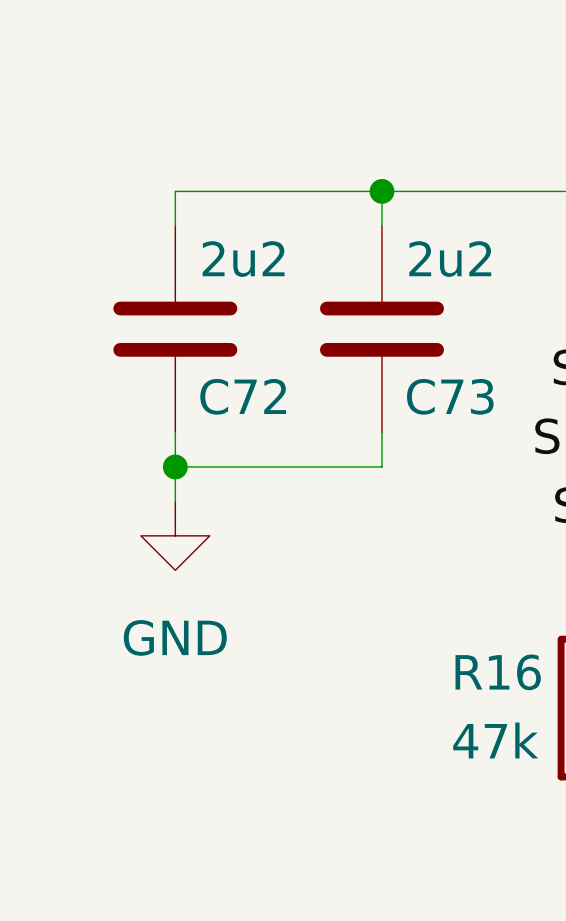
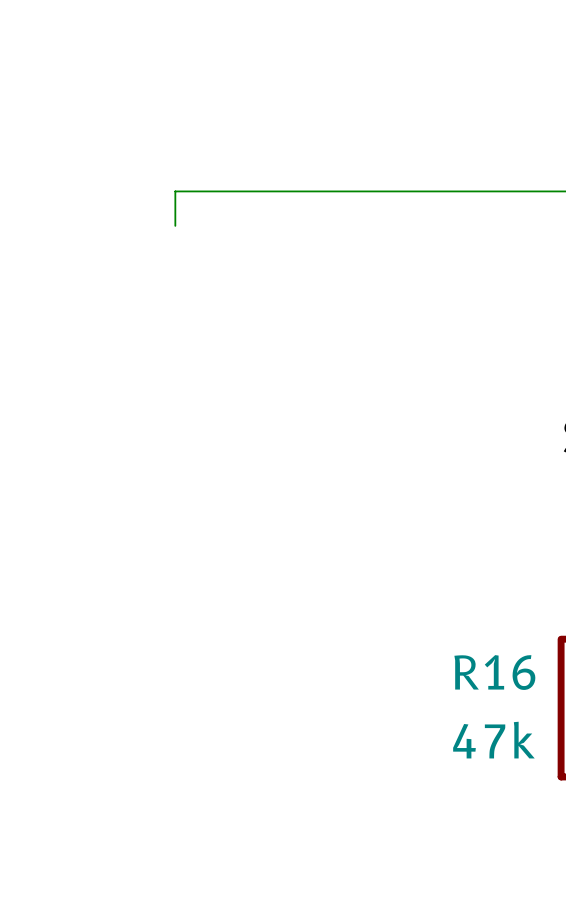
wire: (381, 191) (381, 225) -> none
junction: (381, 191) -> none
C72: 2u2 (175, 329) -> none
C73: 2u2 (381, 329) -> none
wire: (175, 432) (175, 501) -> none
wire: (381, 432) (381, 466) (175, 466) -> none
junction: (175, 466) -> none
power symbol: GND (175, 535) -> none

